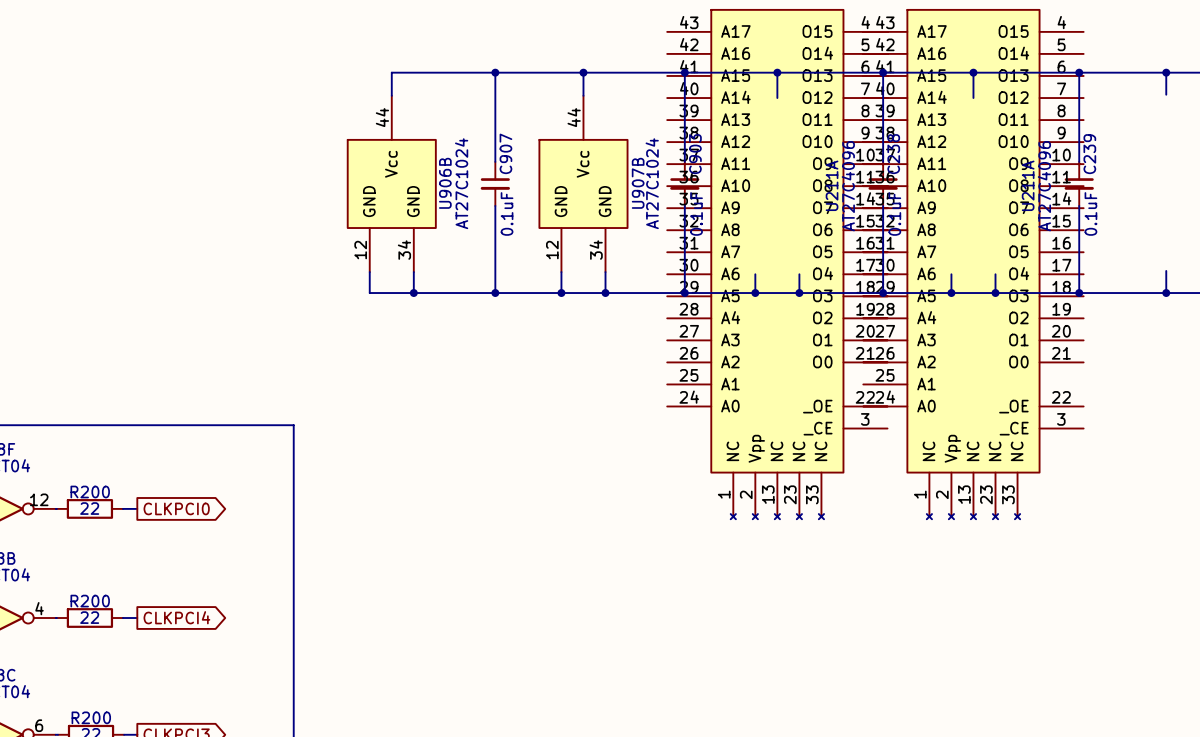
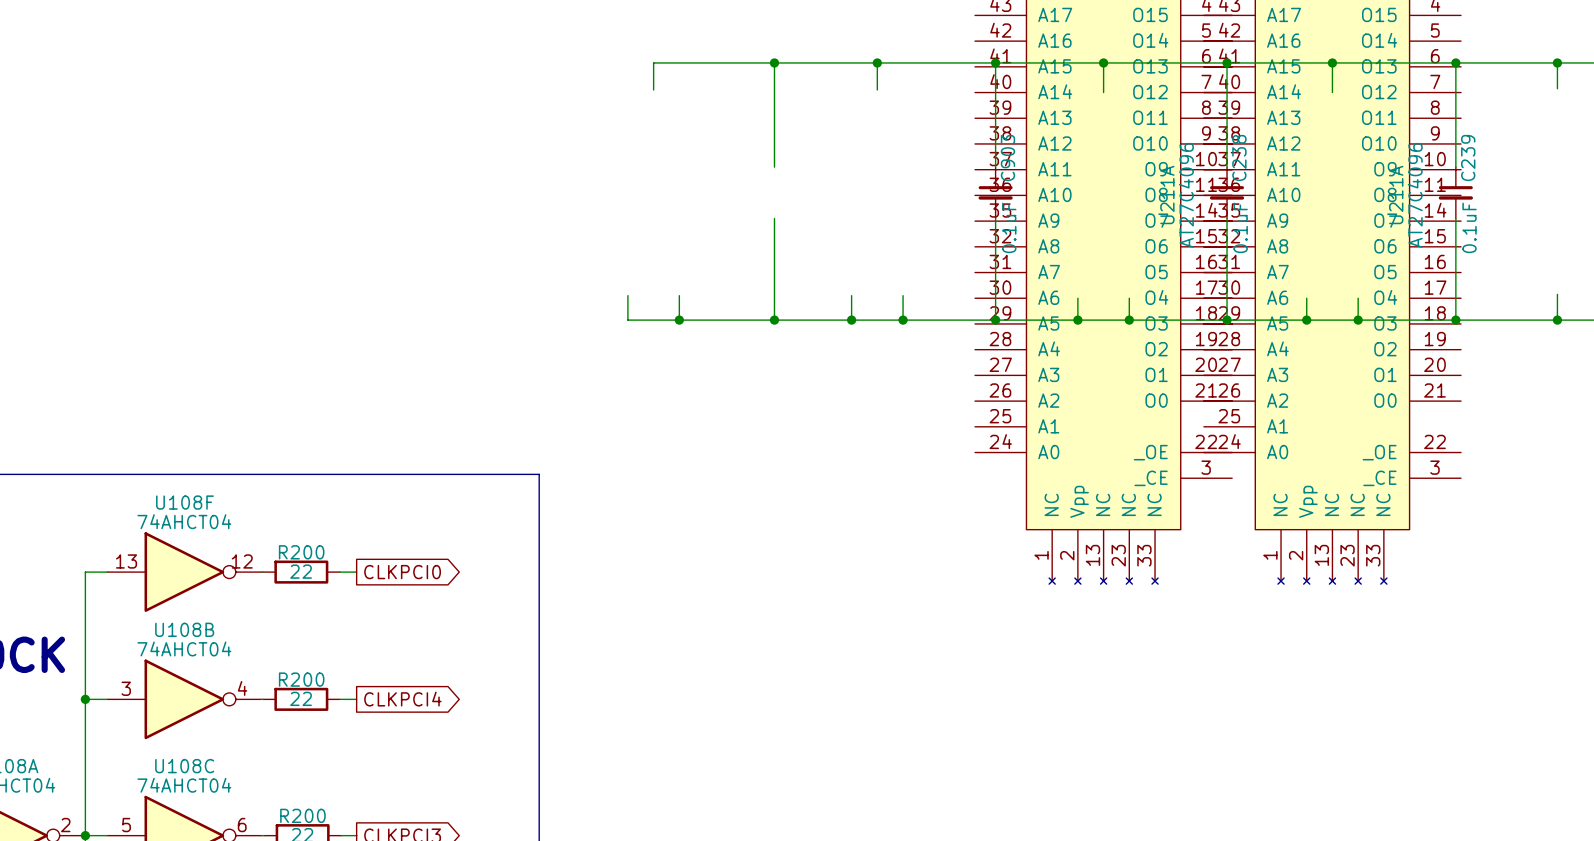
U906B: AT27C1024 (391, 183) -> none
C907: 0.1uF (495, 183) -> none
U907B: AT27C1024 (583, 183) -> none

